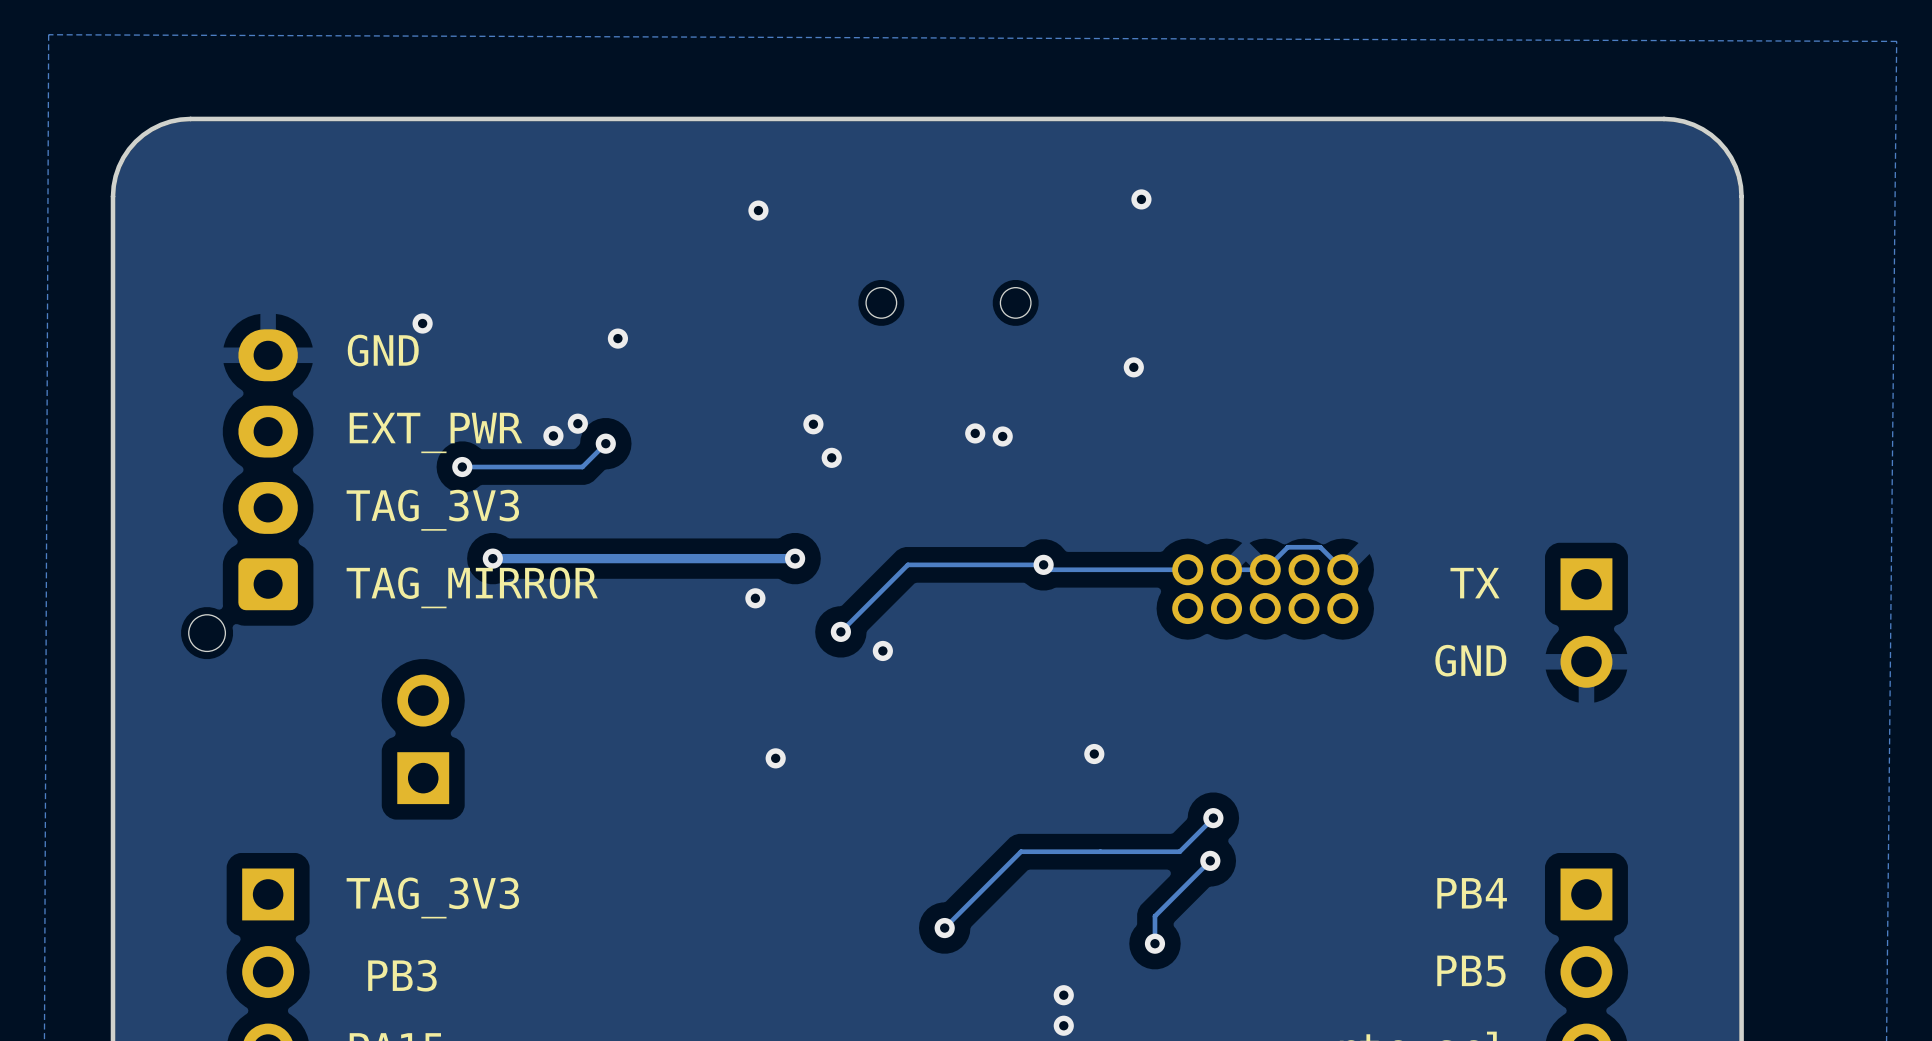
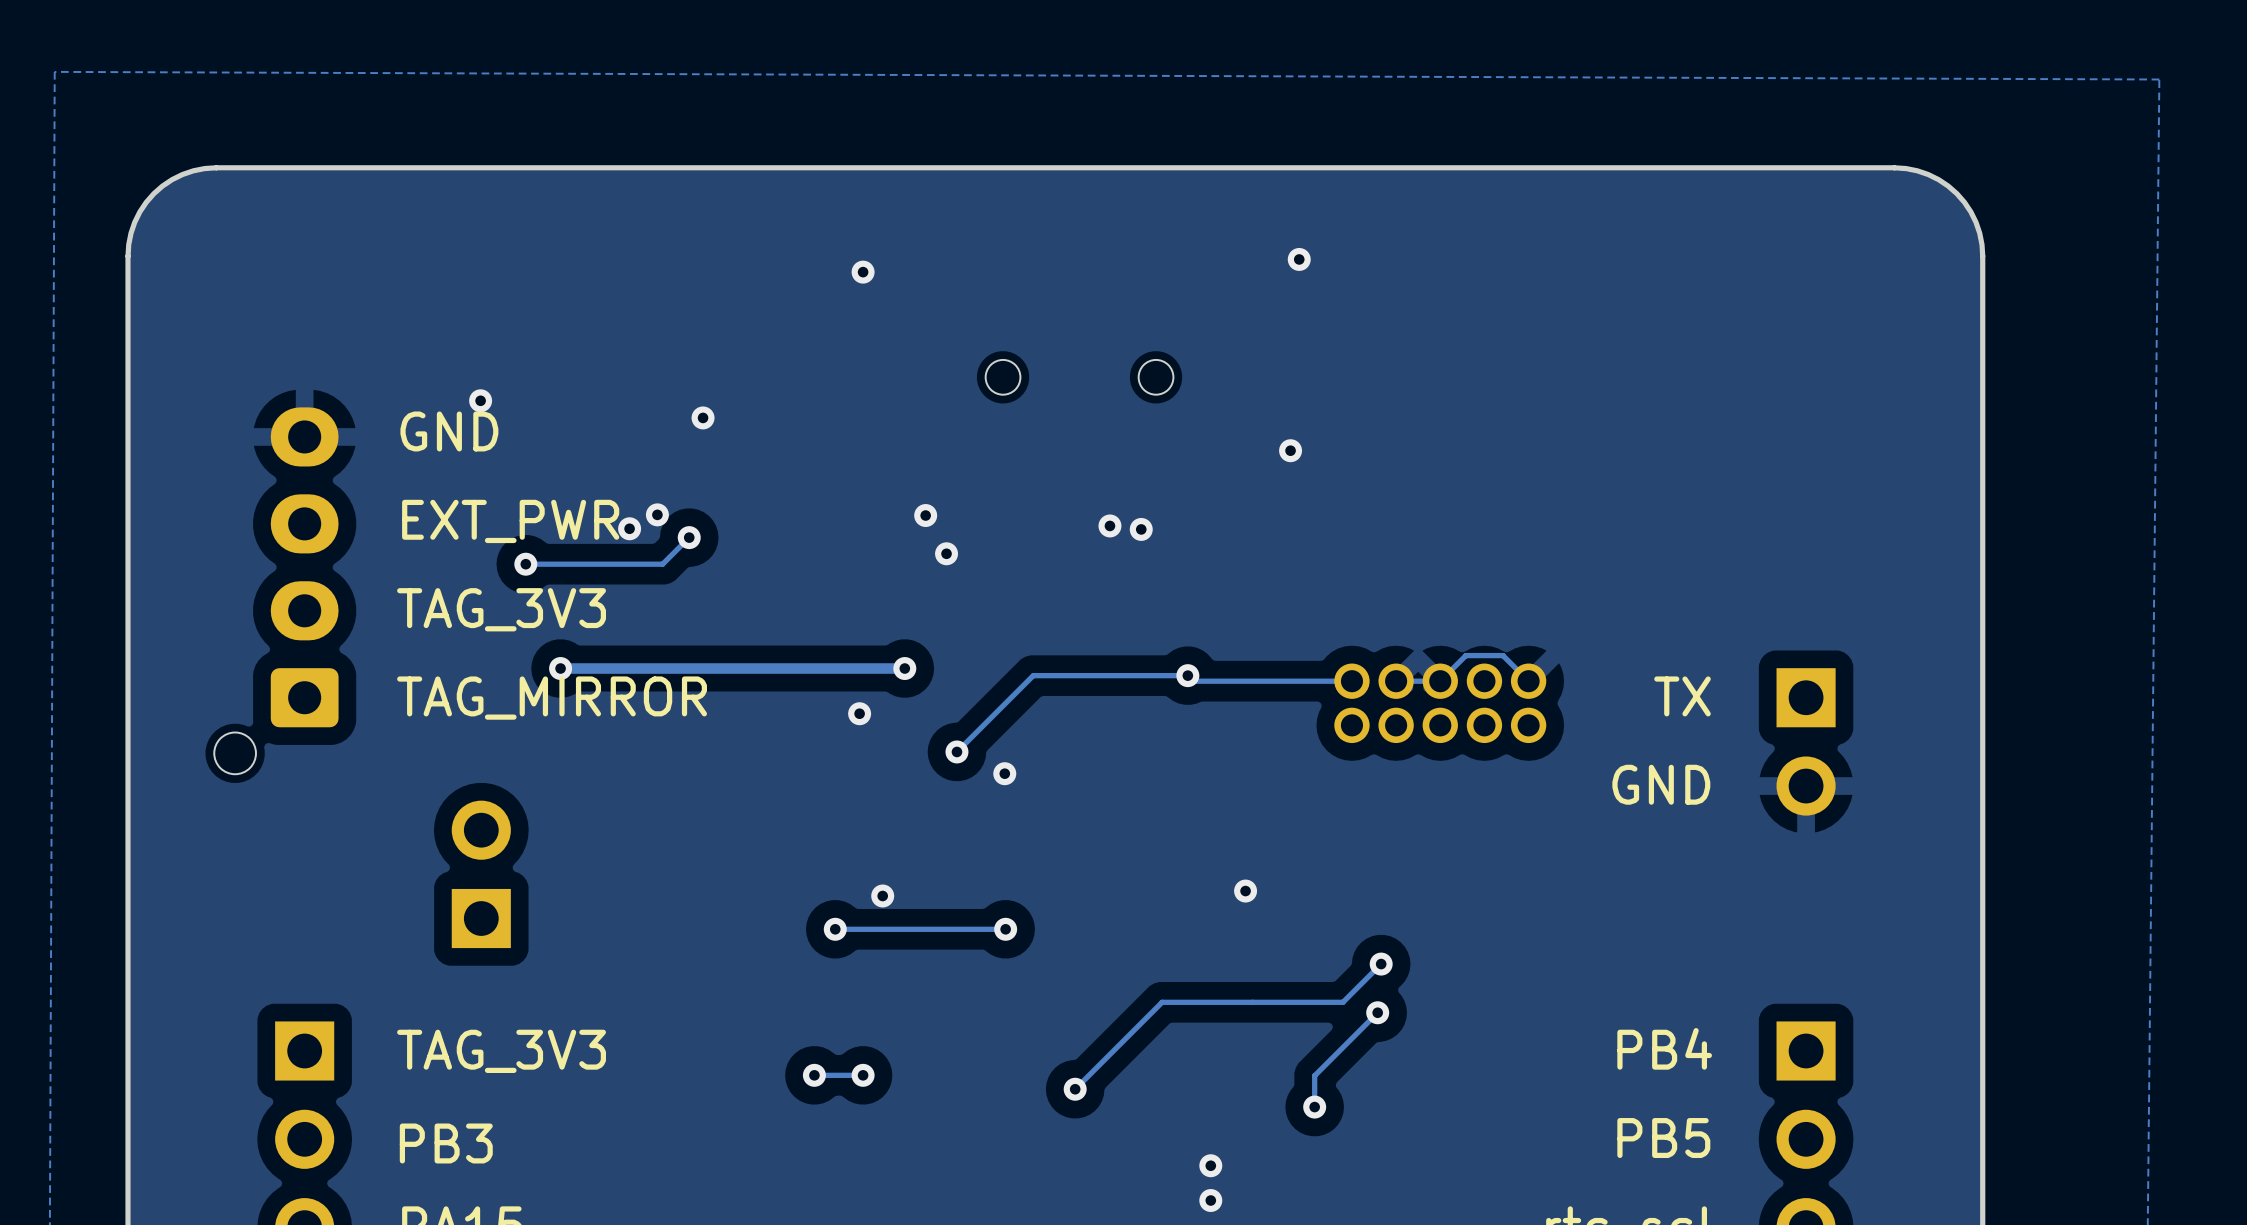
via: none -> (835, 929)
track: none -> (1005, 929) (835, 929)
via: none -> (1005, 929)
via: none -> (814, 1075)
track: none -> (863, 1075) (814, 1075)
via: none -> (863, 1075)

